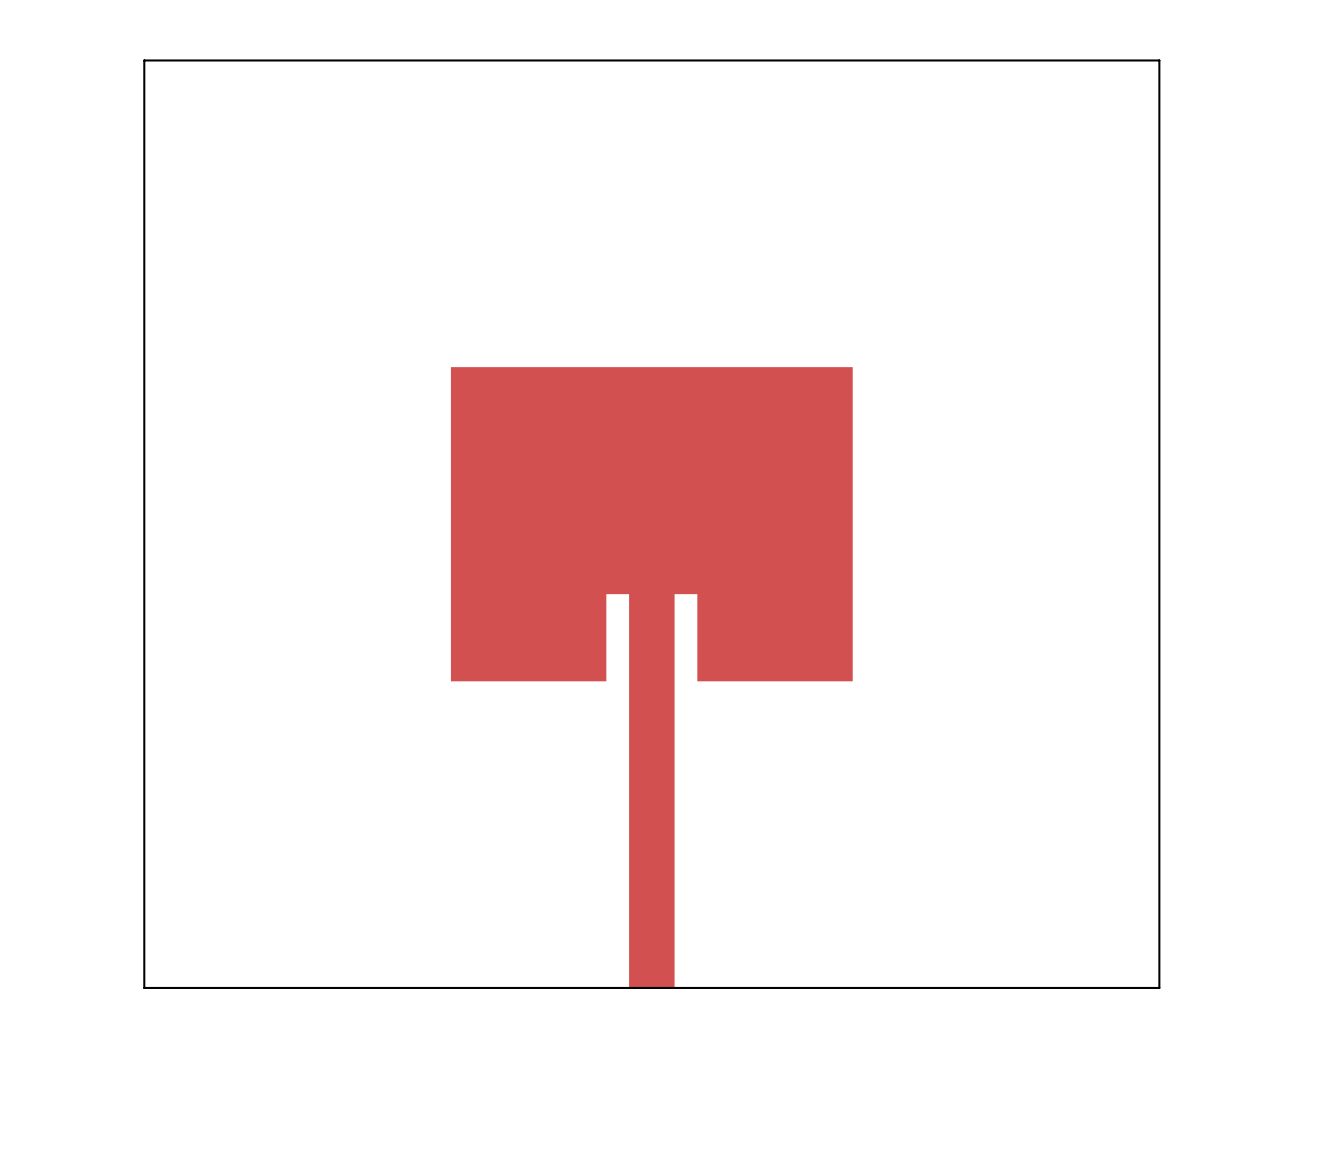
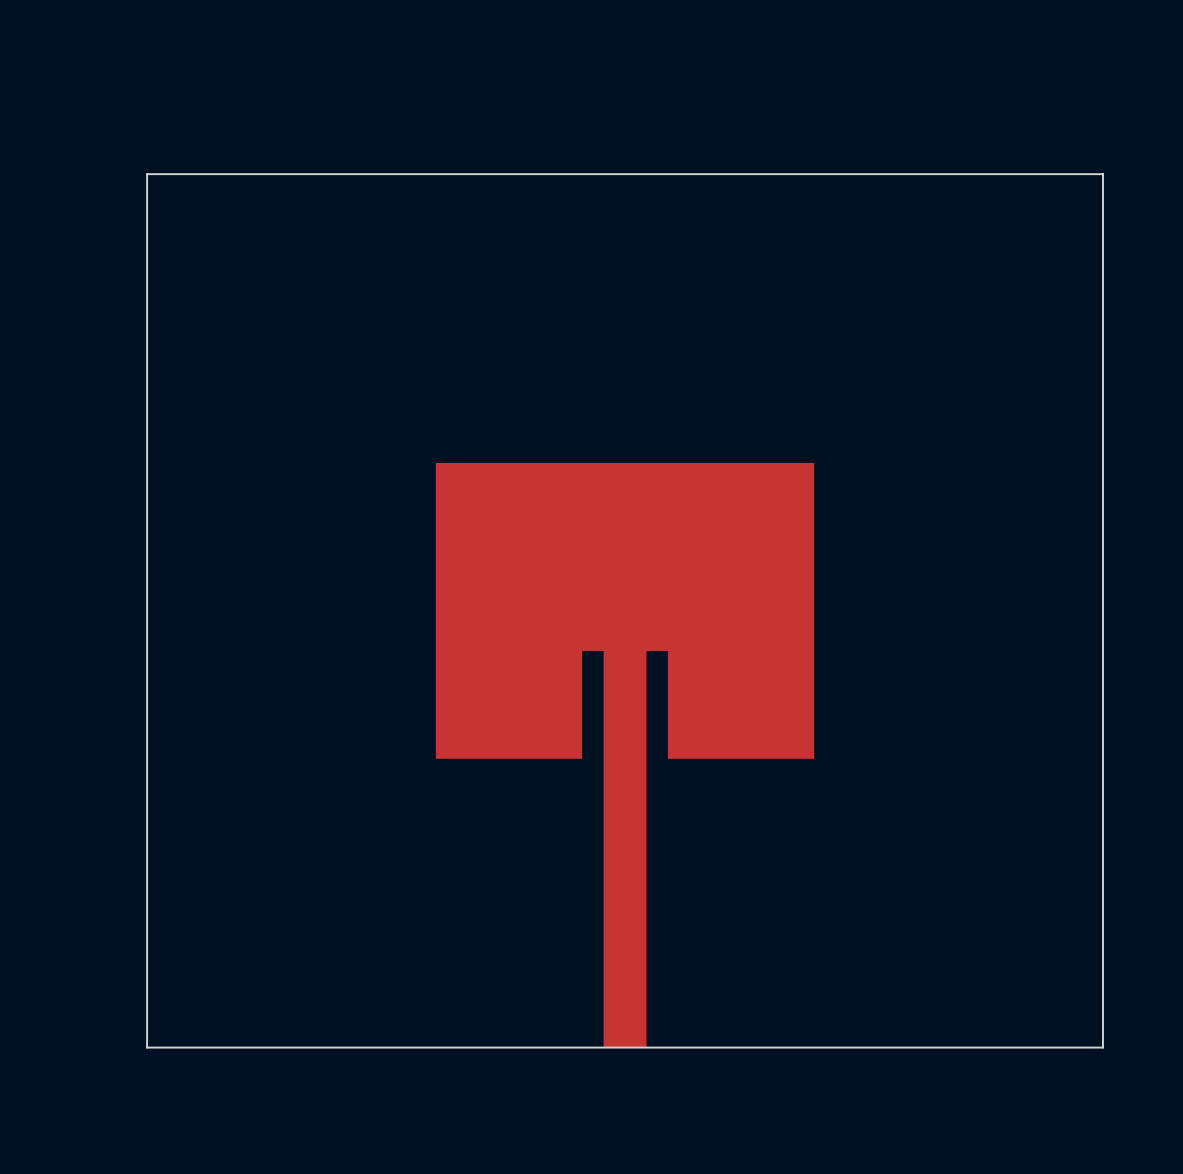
part footprint: [450, 367, 853, 988] -> [435, 462, 815, 1048]

